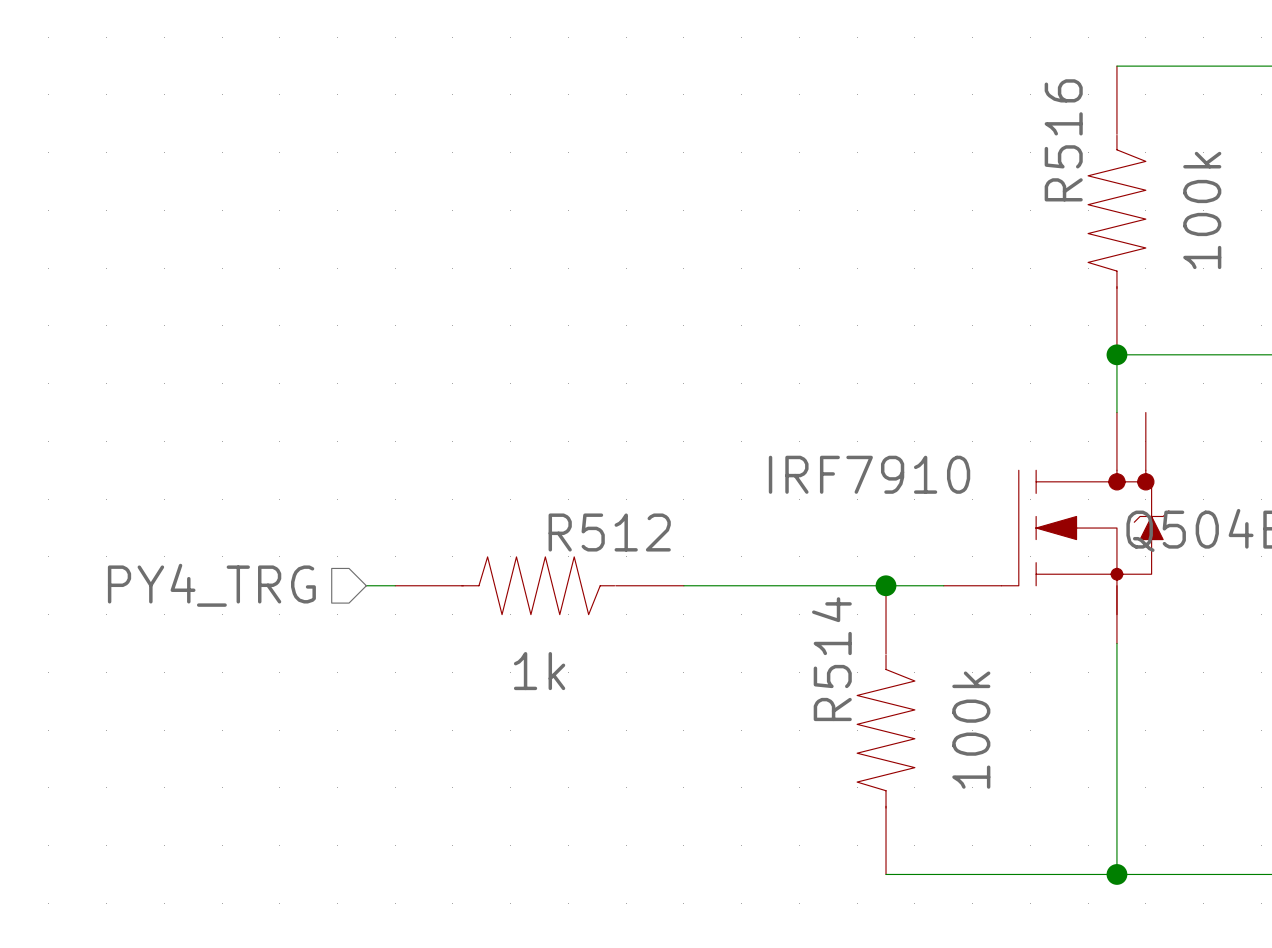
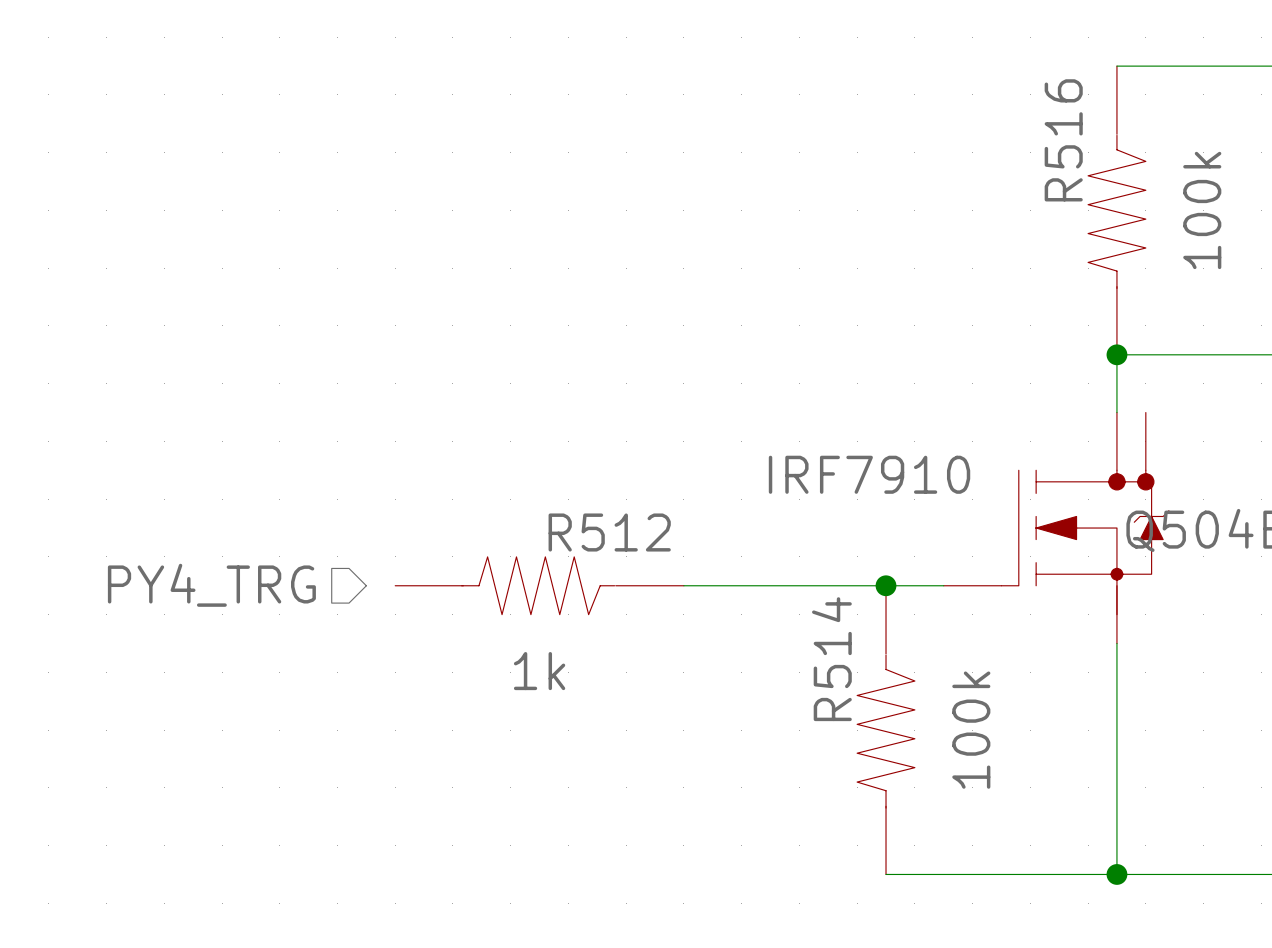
wire: (366, 585) (395, 585) -> none

